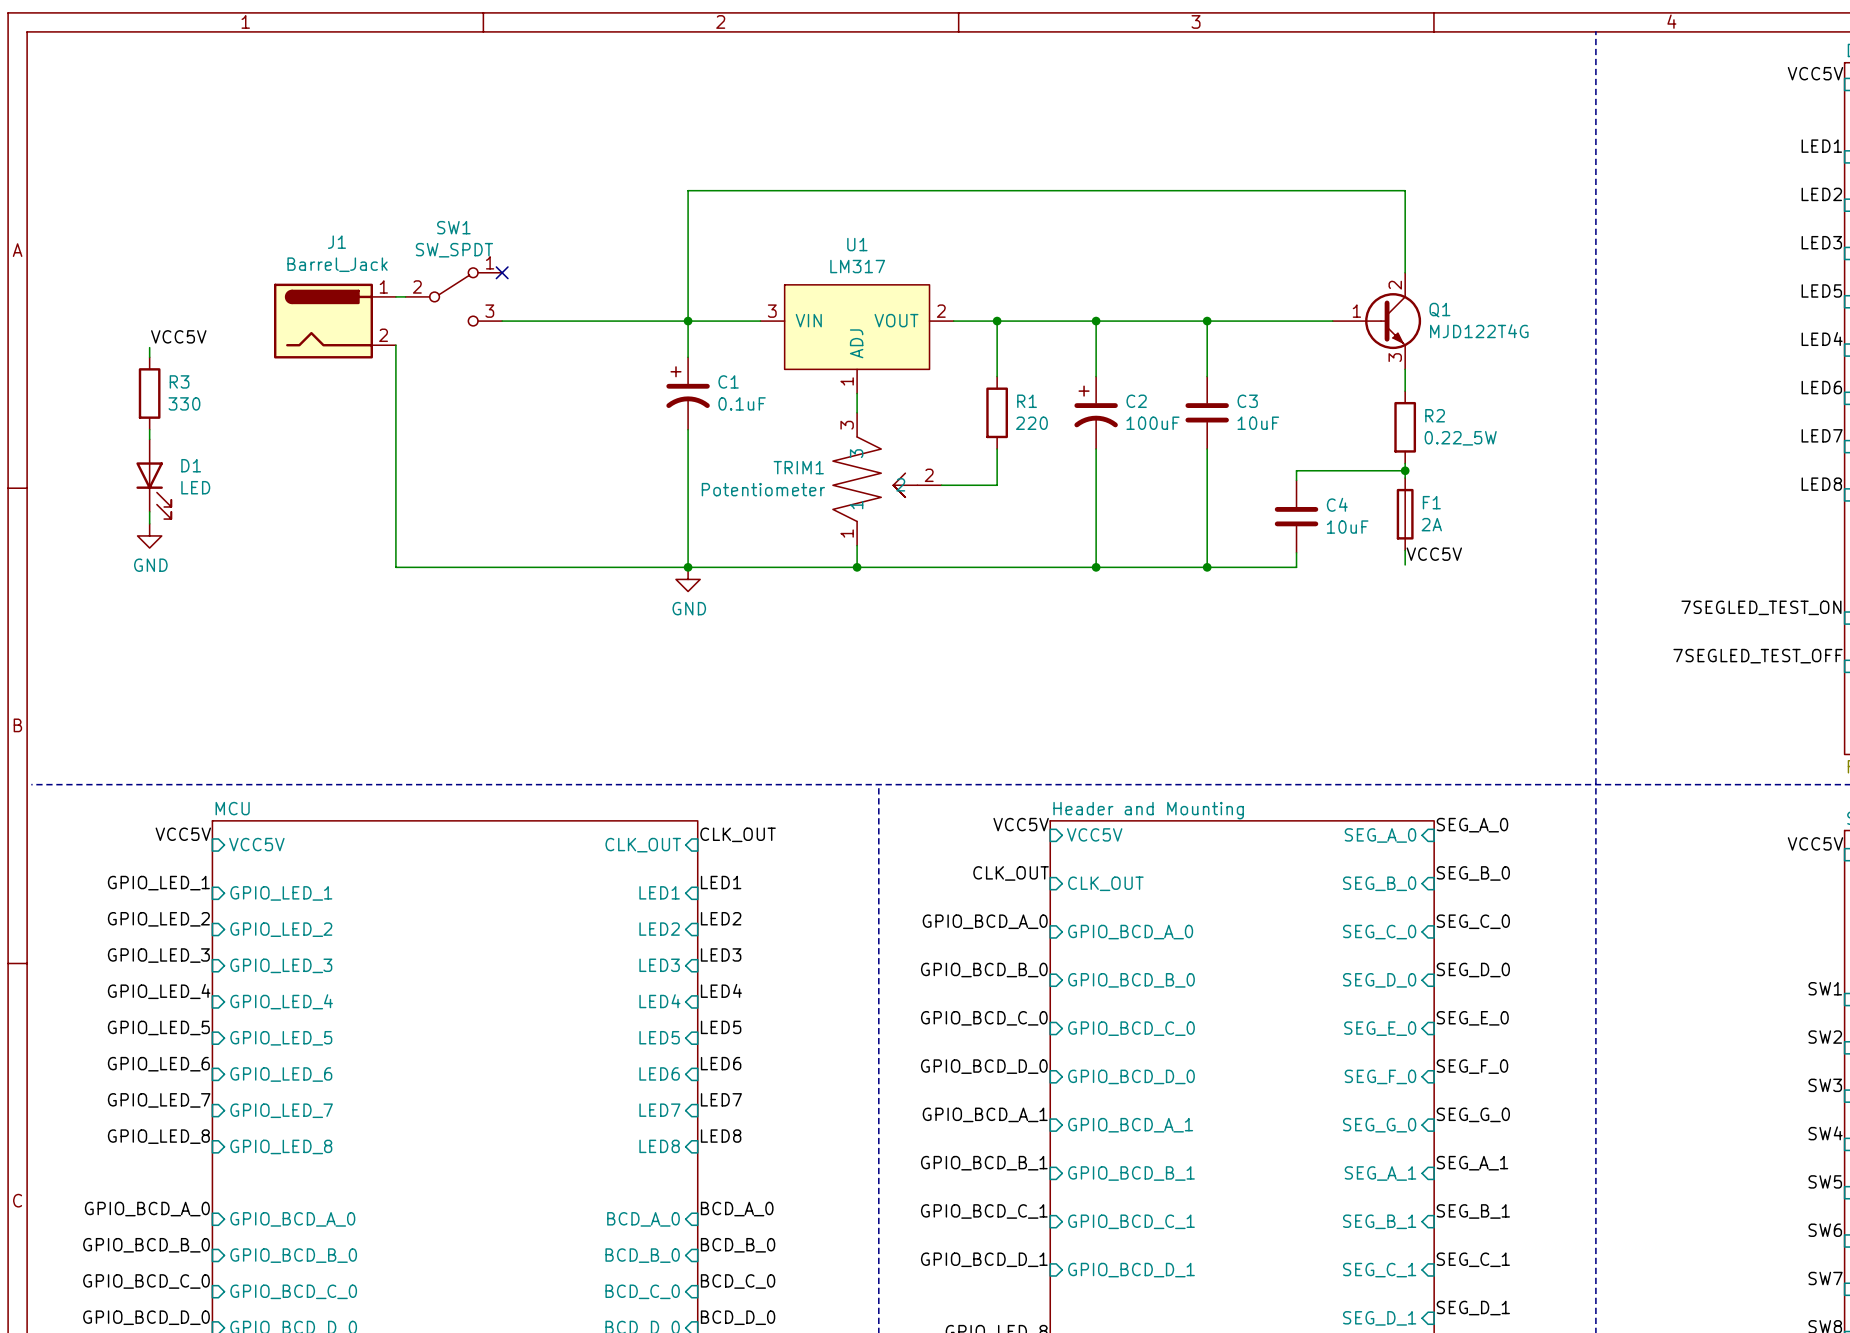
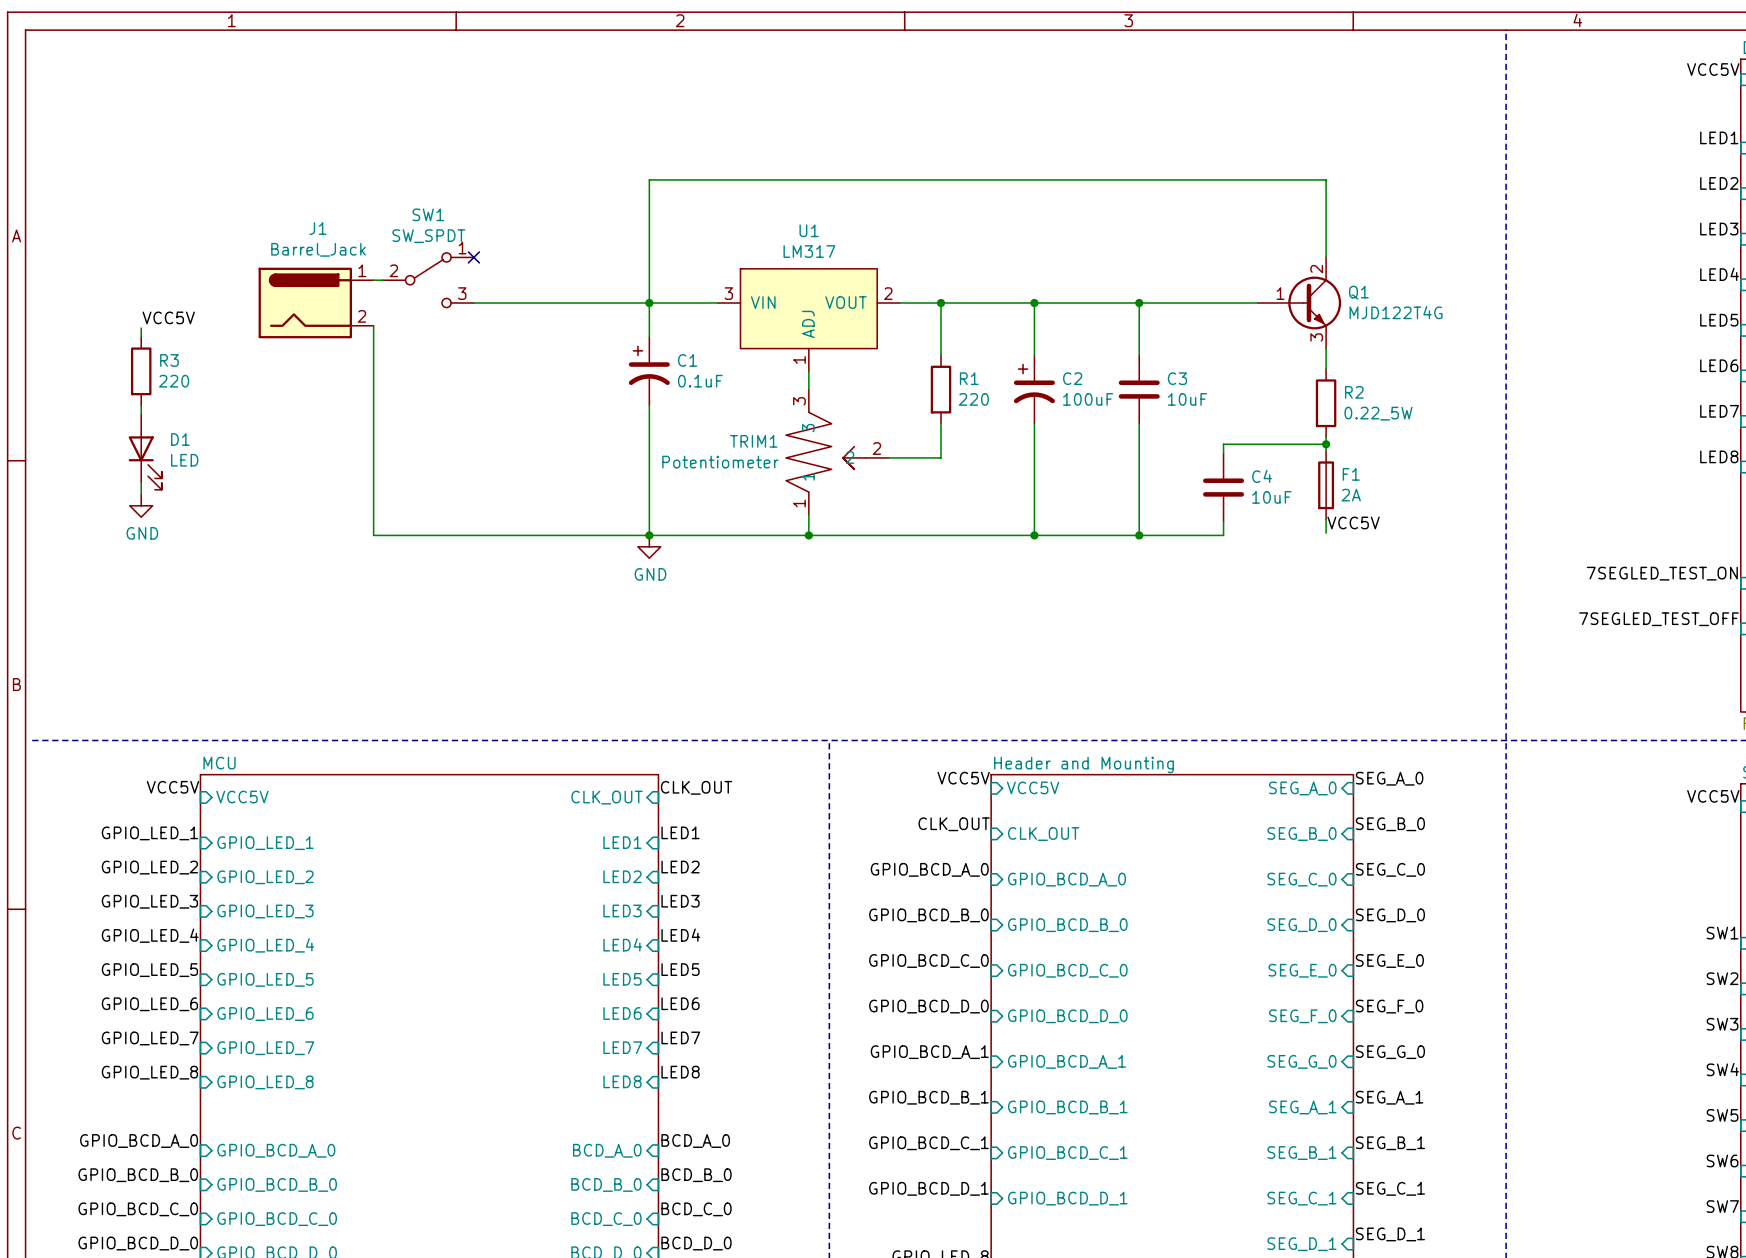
label: LED5 (1821, 290) -> LED4 (1719, 274)
label: LED4 (1822, 338) -> LED5 (1719, 320)
R3 value: 330 (184, 403) -> 220 (174, 381)

